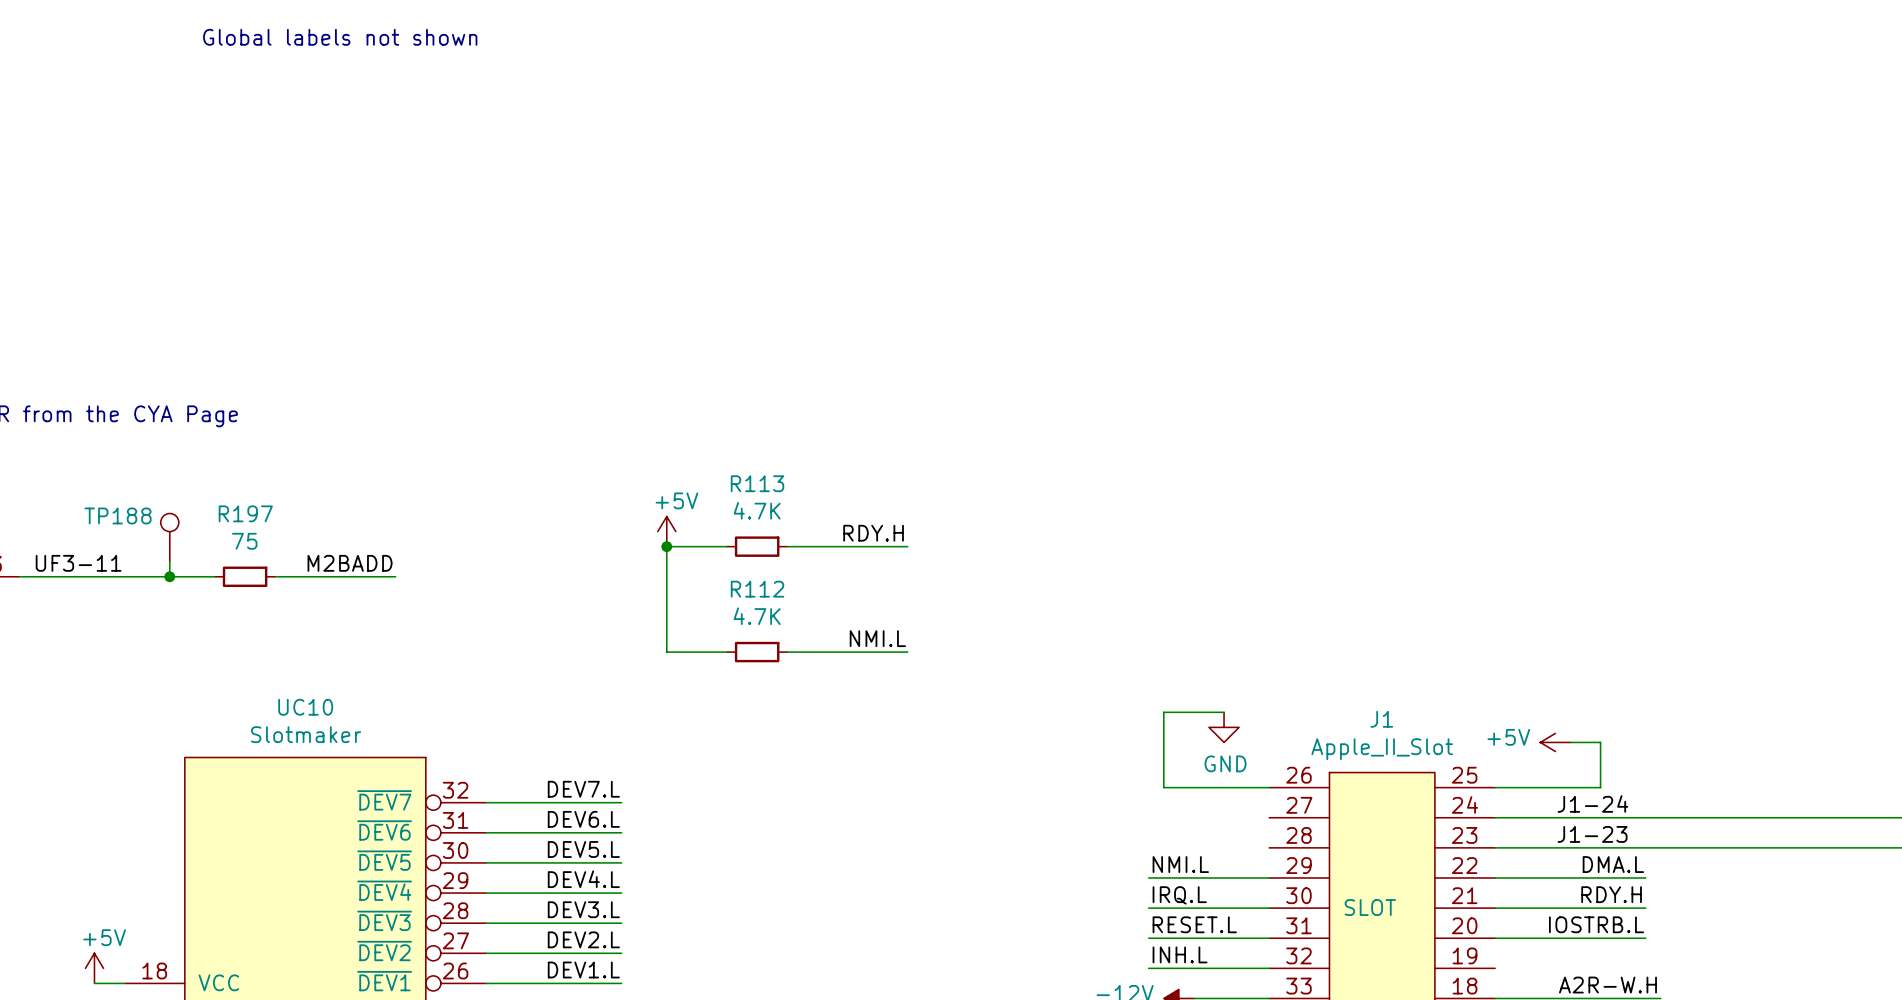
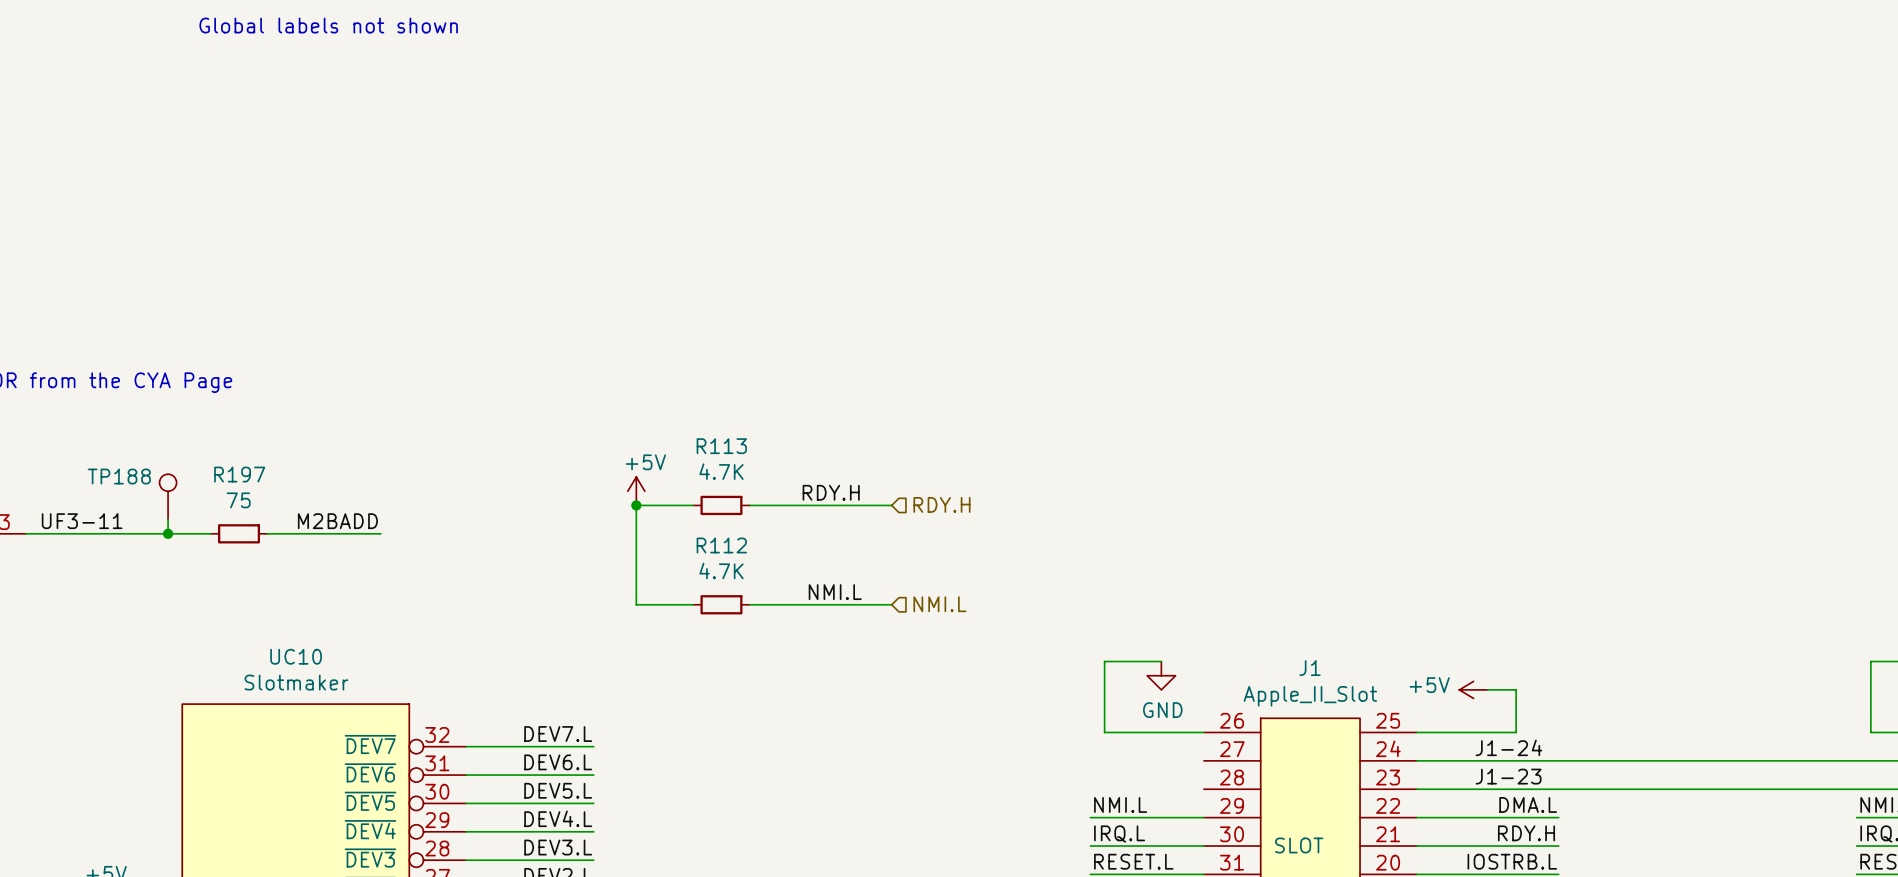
wire: none -> (863, 505) (891, 505)
hierarchical label: none -> RDY.H (941, 504)
hierarchical label: none -> NMI.L (939, 604)
wire: none -> (863, 604) (891, 604)

